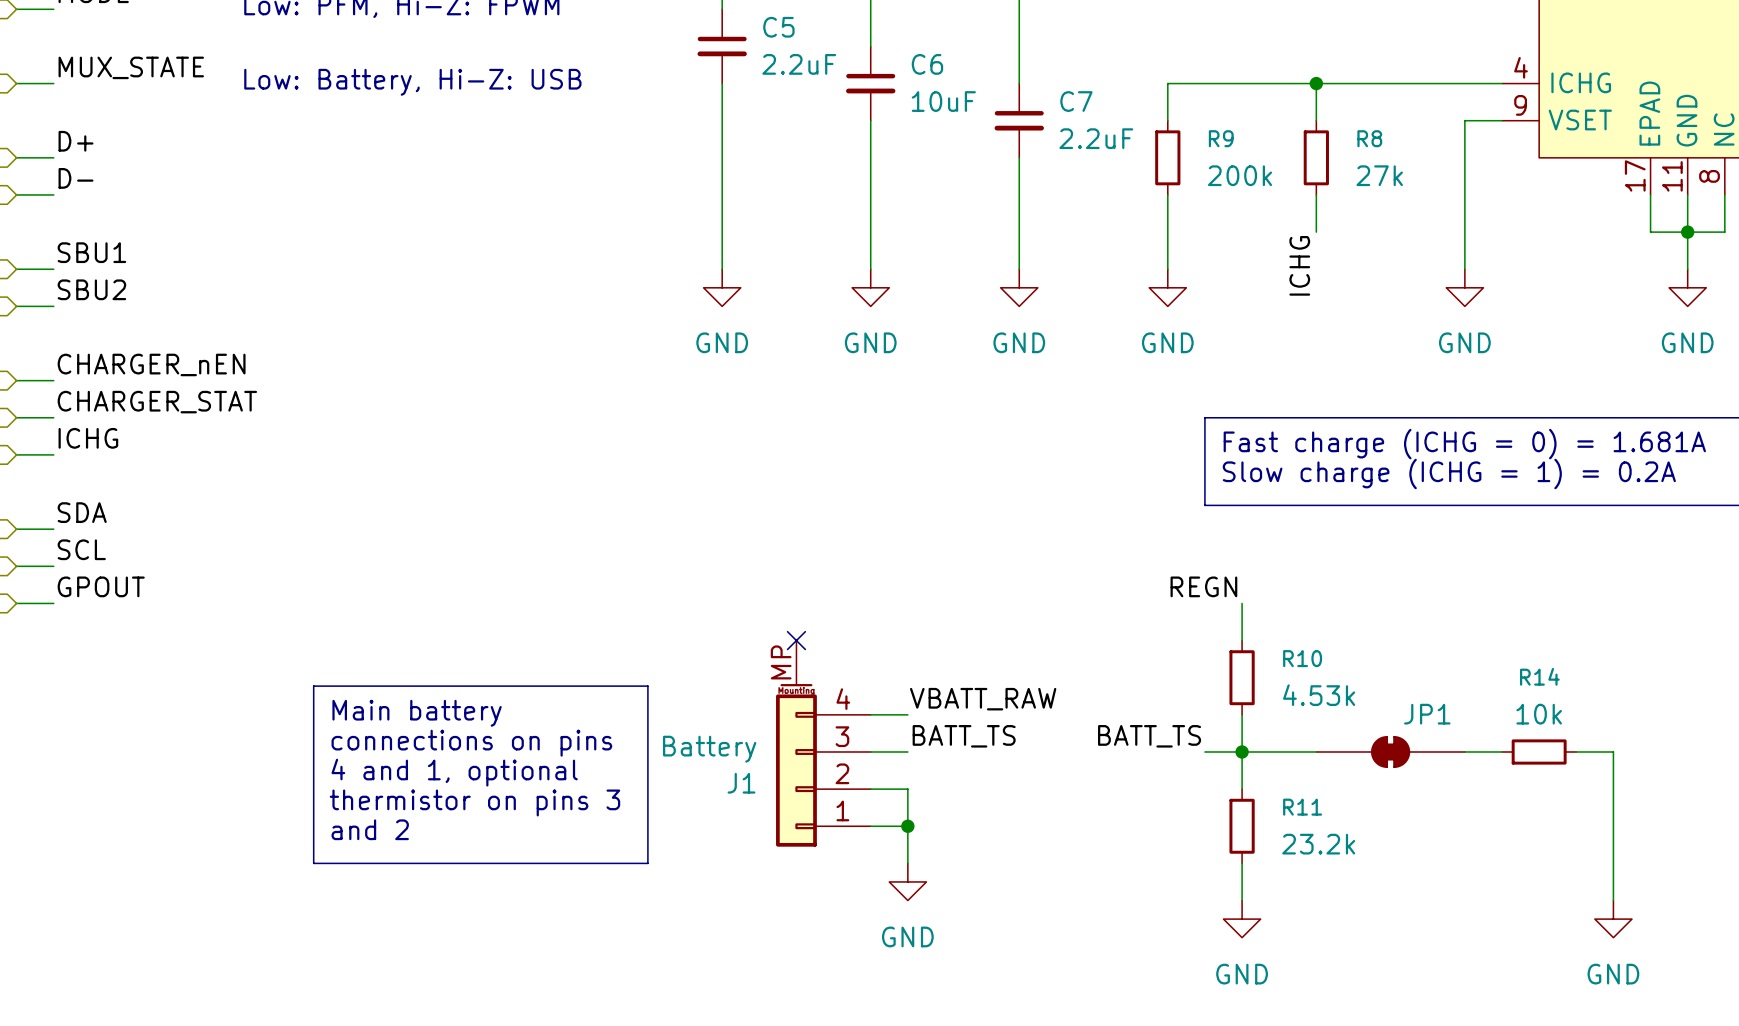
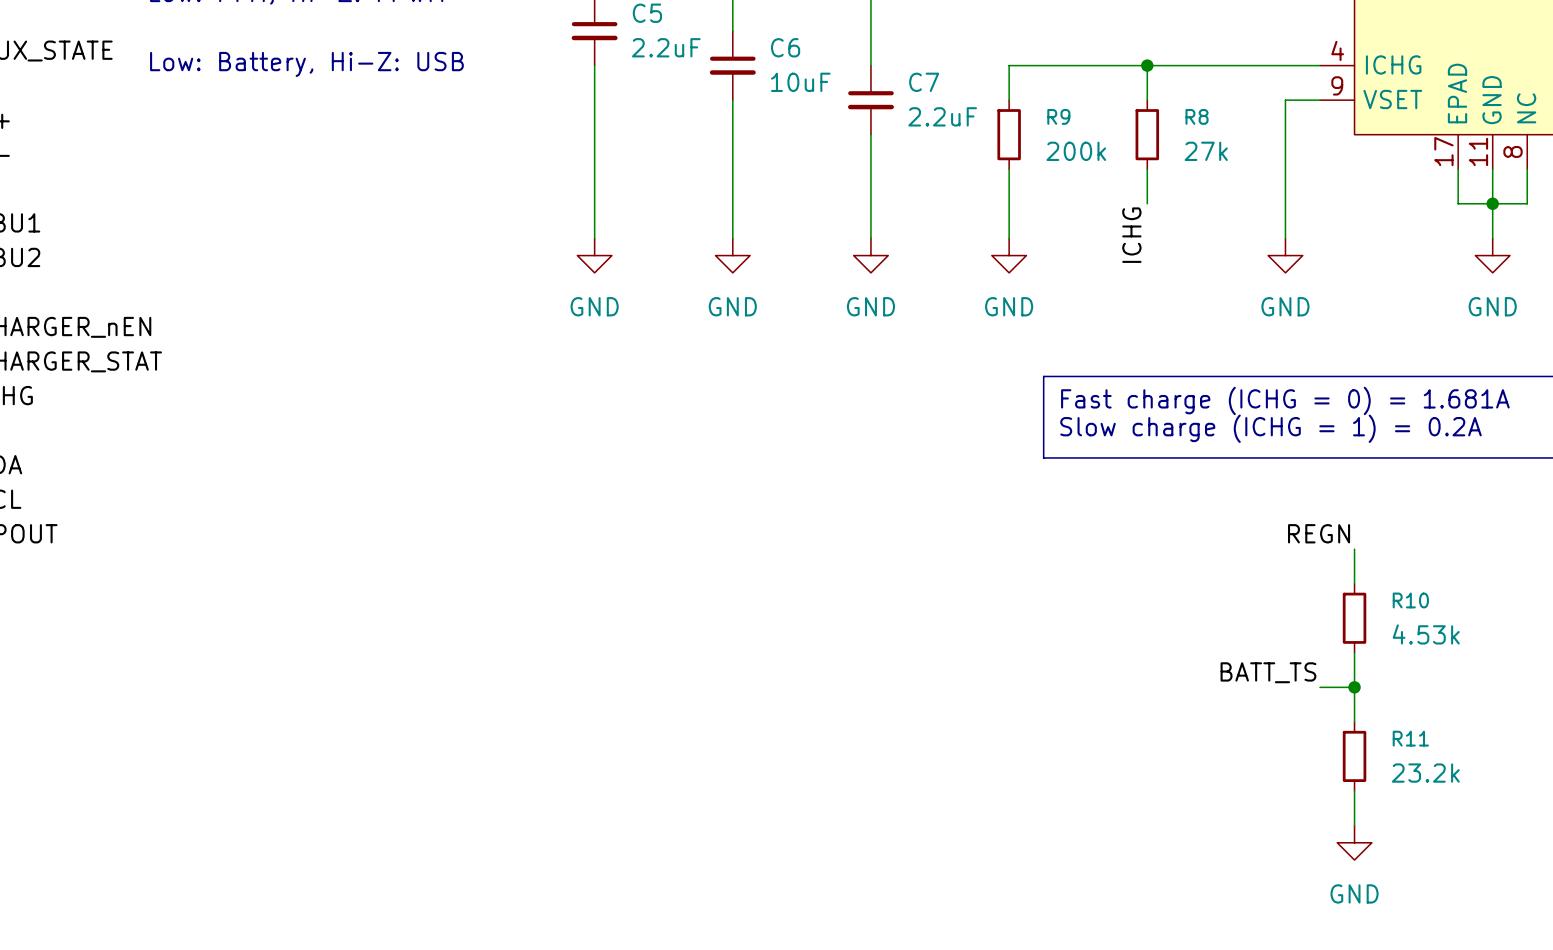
label position: REGN (1203, 586) -> REGN (1319, 533)
wire: (1242, 603) (1242, 640) -> (1354, 549) (1354, 583)
no-connect mark: (796, 640) -> none
R10 position: (1242, 677) -> (1354, 618)
line: (313, 686) (647, 686) (647, 863) (313, 863) (313, 686) -> none
label: VBATT_RAW (983, 699) -> none
text: Main battery (417, 713) -> none
wire: (870, 714) (907, 714) -> none
wire: (1242, 714) (1242, 789) -> (1354, 652) (1354, 721)
label: BATT_TS (964, 736) -> none
label: BATT_TS (1149, 736) -> none
label: none -> BATT_TS (1268, 672)
text: connections on pins (471, 743) -> none
J1: Battery (823, 743) -> none
wire: (870, 751) (907, 751) -> none
wire: (1204, 751) (1316, 751) -> none
junction: (1242, 751) -> none
JP1: (1390, 751) -> none
wire: (1464, 751) (1502, 751) -> (1354, 687) (1320, 687)
junction: none -> (1354, 687)
R14: 10k (1539, 751) -> none
wire: (1576, 751) (1613, 751) (1613, 900) -> none
text: 4 and 1, optional (454, 772) -> none
wire: (870, 789) (907, 789) (907, 863) -> none
text: thermistor on pins 3 (474, 802) -> none
wire: (870, 826) (907, 826) -> none
junction: (907, 826) -> none
R11 position: (1242, 826) -> (1354, 756)
text: and 2 (370, 829) -> none
wire: (1242, 863) (1242, 900) -> (1354, 790) (1354, 825)
power symbol: GND (907, 881) -> none
power symbol: GND (1242, 919) -> none
power symbol position: GND (1613, 919) -> GND (1354, 842)

